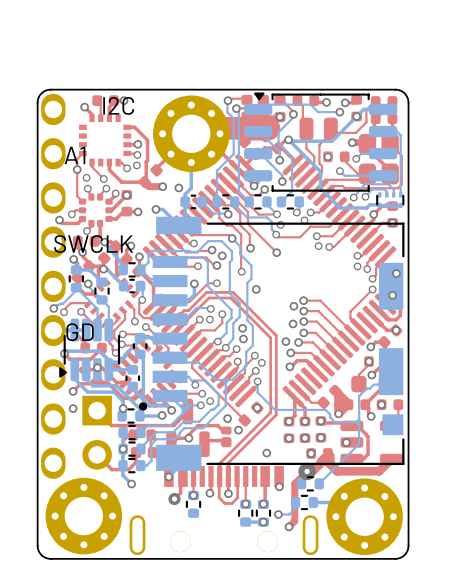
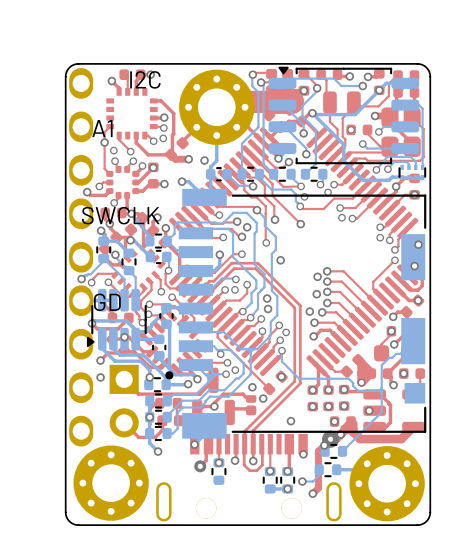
via: none -> (340, 434)
via: none -> (324, 445)

